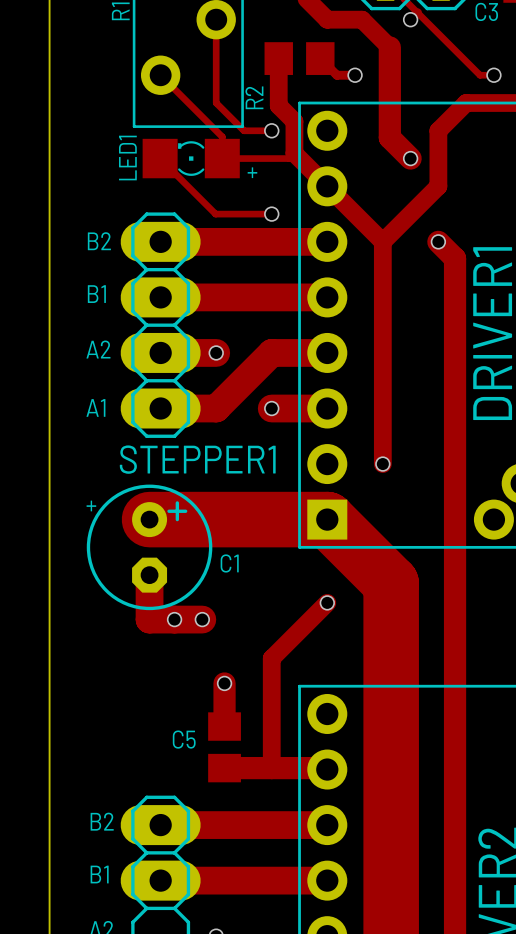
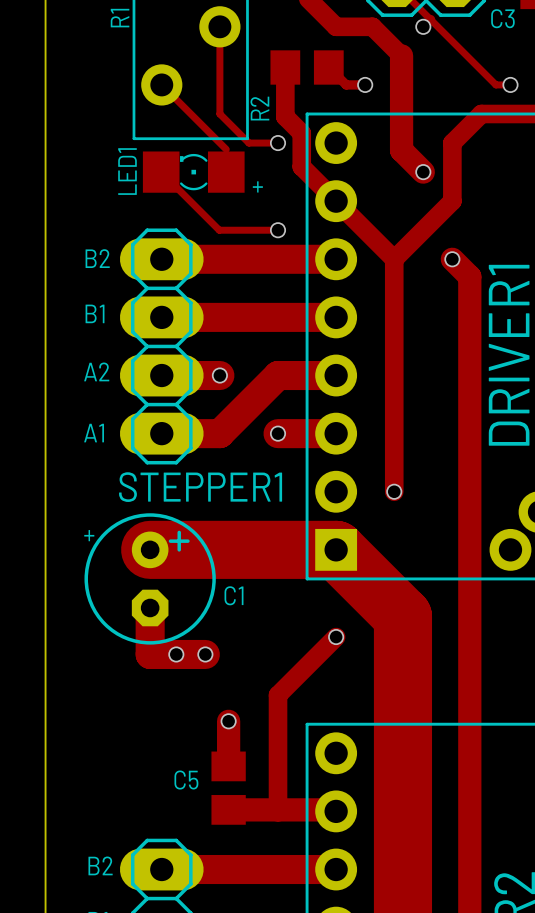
track: (222, 136) (222, 158) (289, 158) (294, 153) -> none

